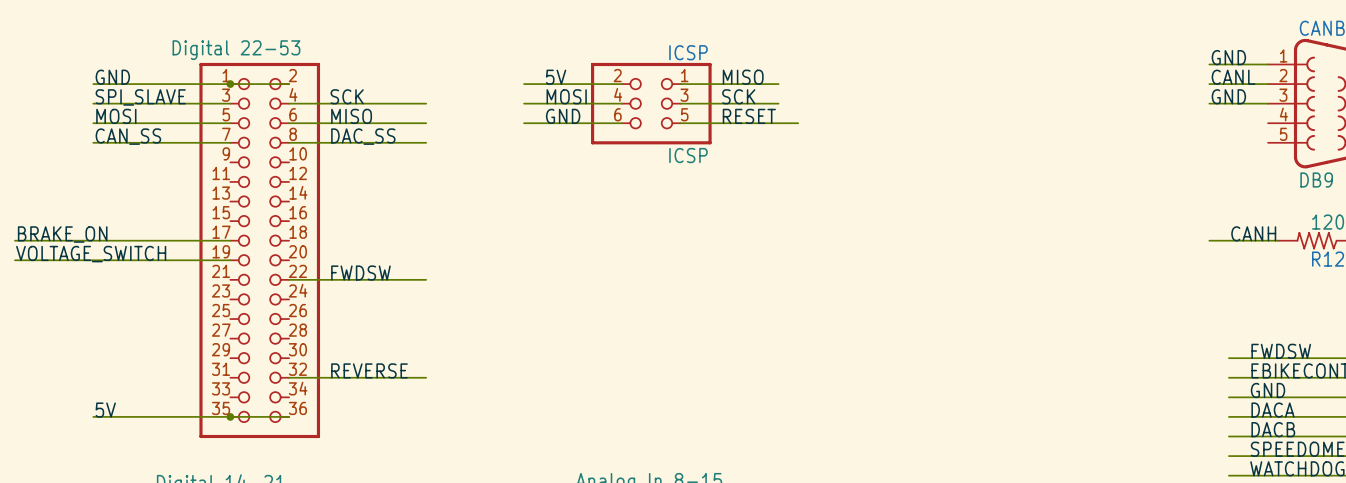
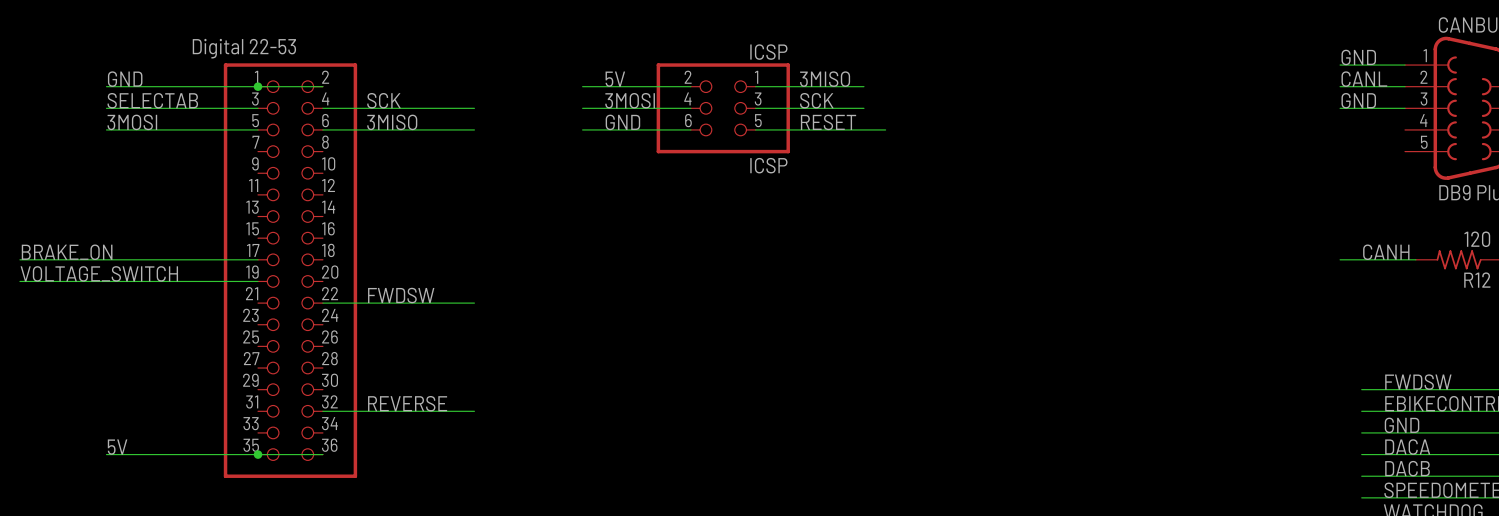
label: MISO (743, 77) -> 3MISO (825, 79)
label: MOSI (566, 96) -> 3MOSI (630, 100)
label: SPI_SLAVE (140, 97) -> SELECTAB (152, 100)
label: MOSI (116, 116) -> 3MOSI (132, 122)
label: MISO (351, 116) -> 3MISO (392, 122)
label: CAN_SS (128, 136) -> none
label: DAC_SS (363, 136) -> none
wire: (93, 142) (230, 142) -> none
wire: (289, 142) (426, 142) -> none

